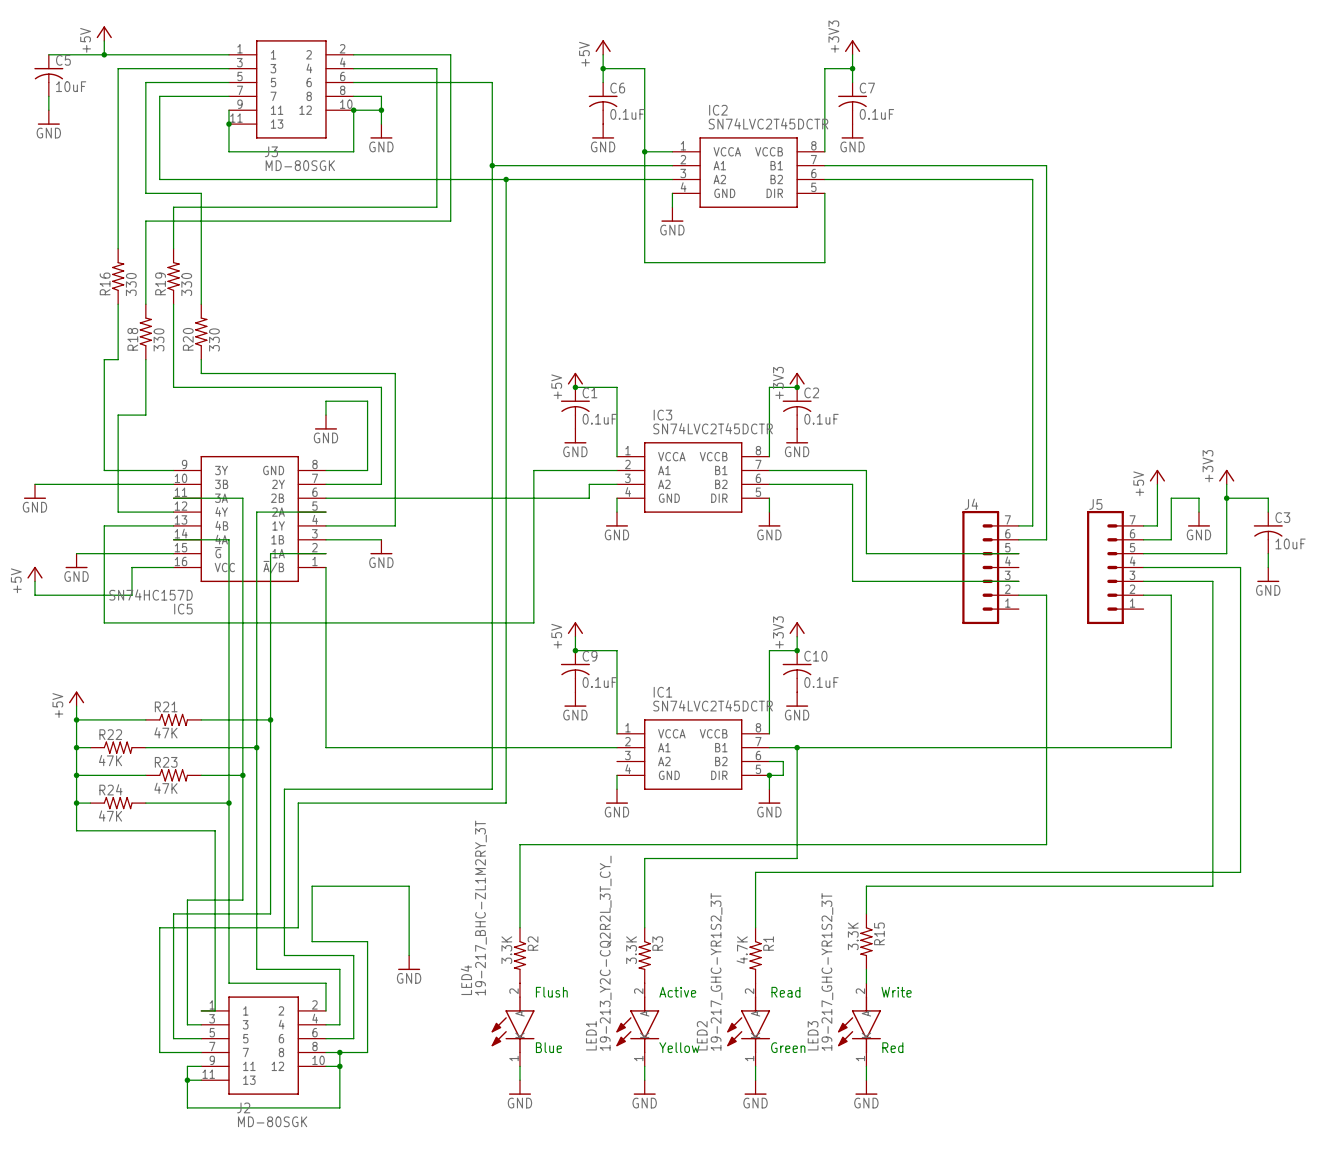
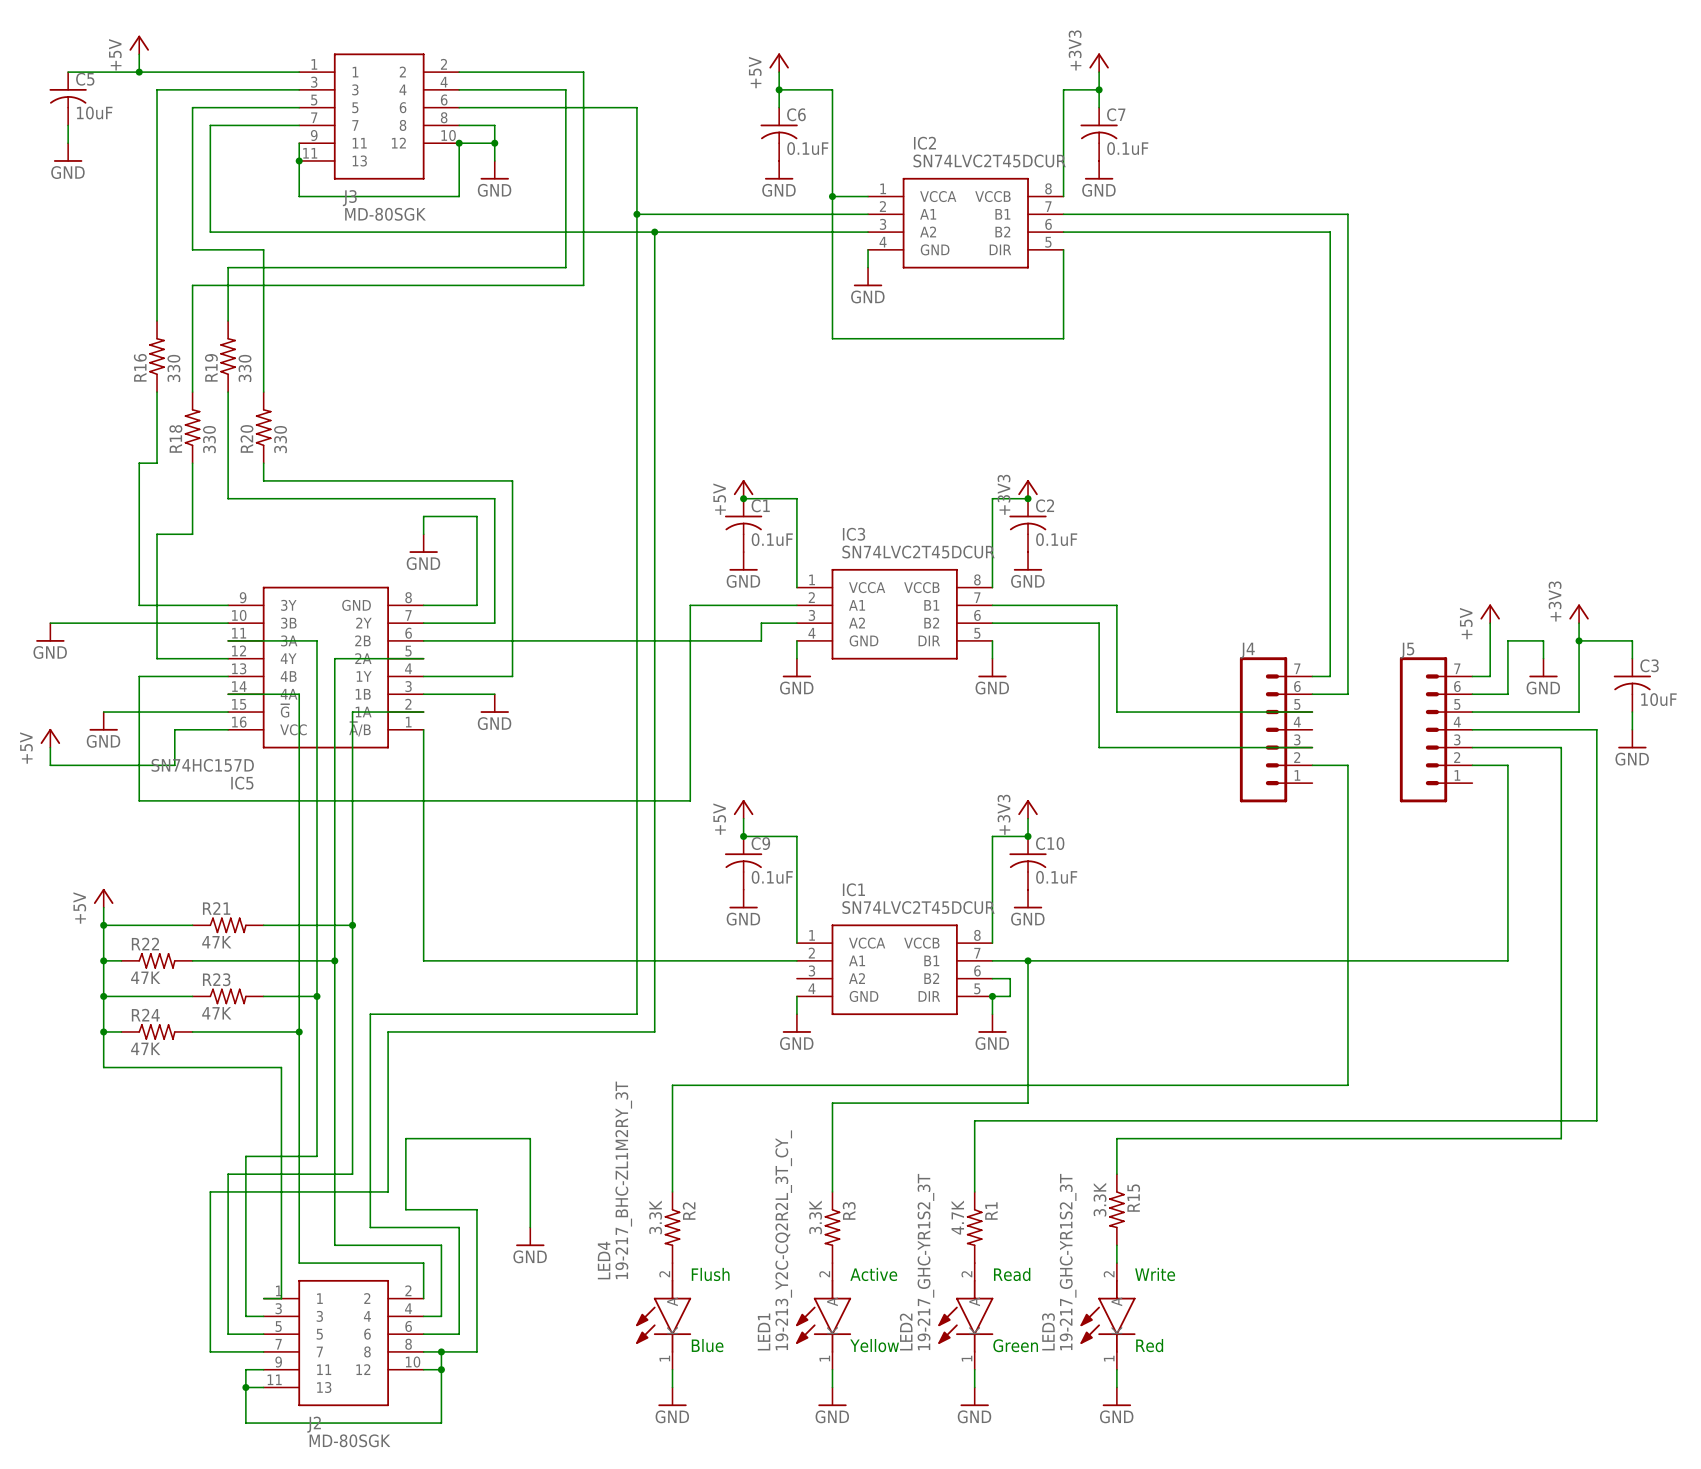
IC2 value: SN74LVC2T45DCTR (768, 123) -> SN74LVC2T45DCUR (989, 160)
IC3 value: SN74LVC2T45DCTR (713, 428) -> SN74LVC2T45DCUR (918, 552)
IC1 value: SN74LVC2T45DCTR (713, 705) -> SN74LVC2T45DCUR (918, 907)

